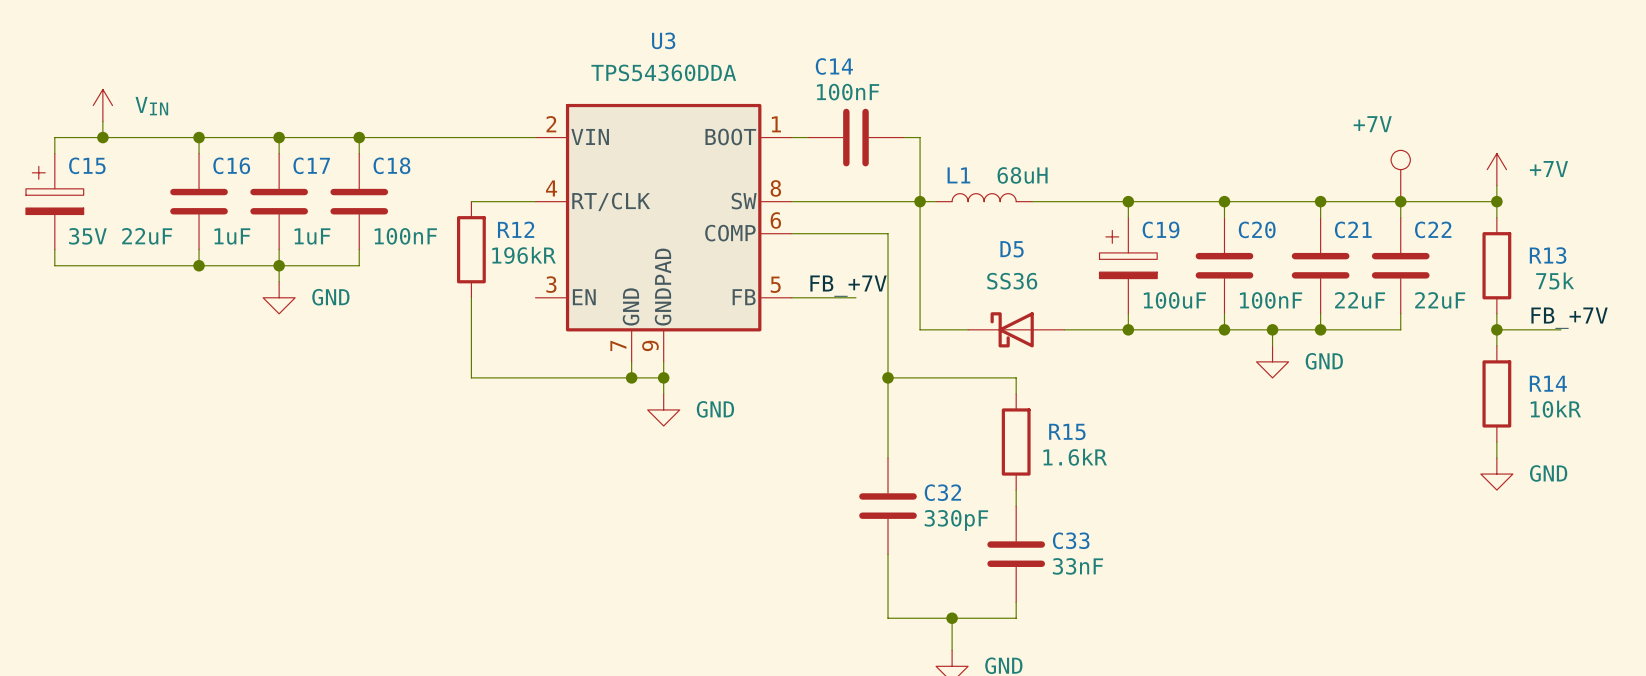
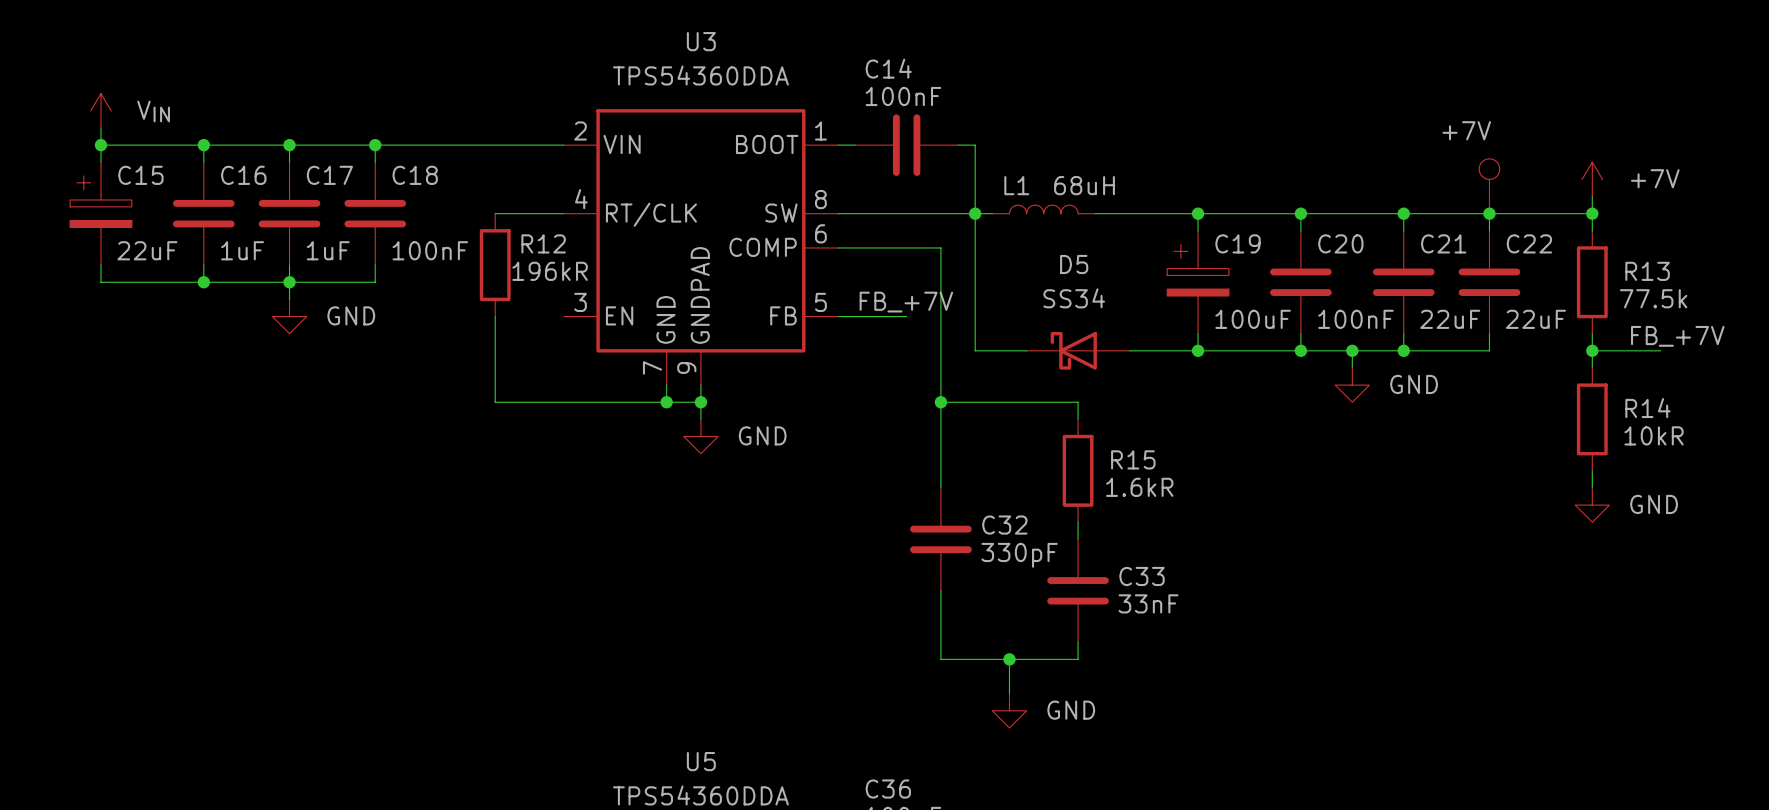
wire: (102, 137) (54, 137) (54, 153) -> (100, 145) (100, 162)
C15 position: (54, 201) -> (100, 213)
C15 value: 35V 22uF (120, 236) -> 22uF (147, 250)
wire: (54, 249) (54, 265) (102, 265) -> (100, 265) (100, 282)
R13 value: 75k (1555, 280) -> 77.5k (1653, 298)
D5 value: SS36 (1012, 281) -> SS34 (1074, 298)

